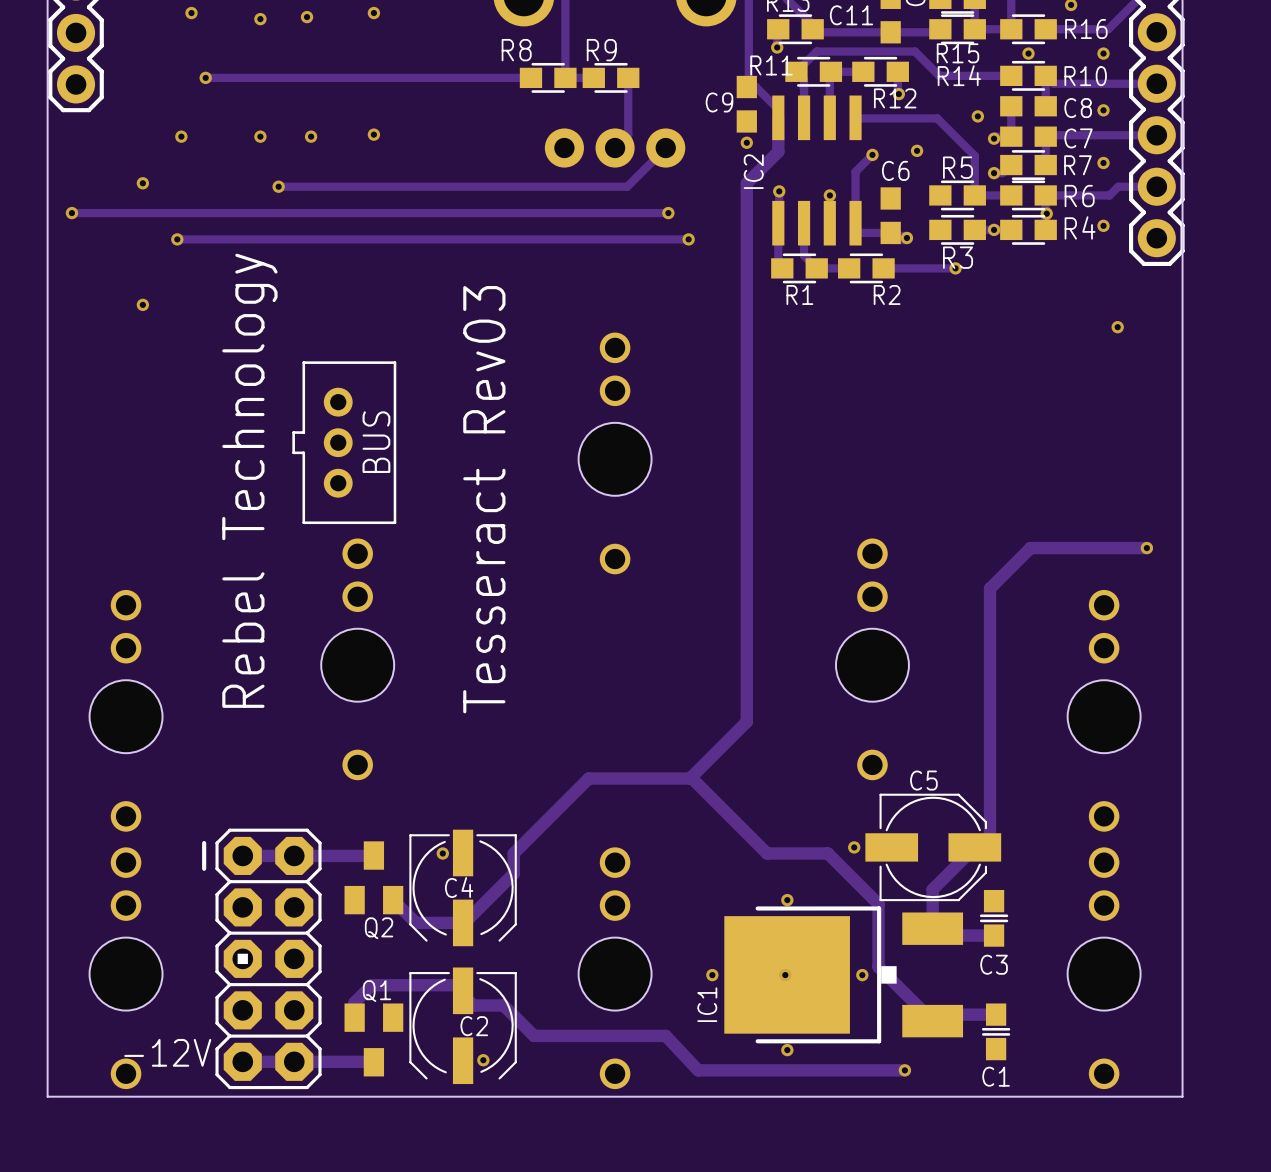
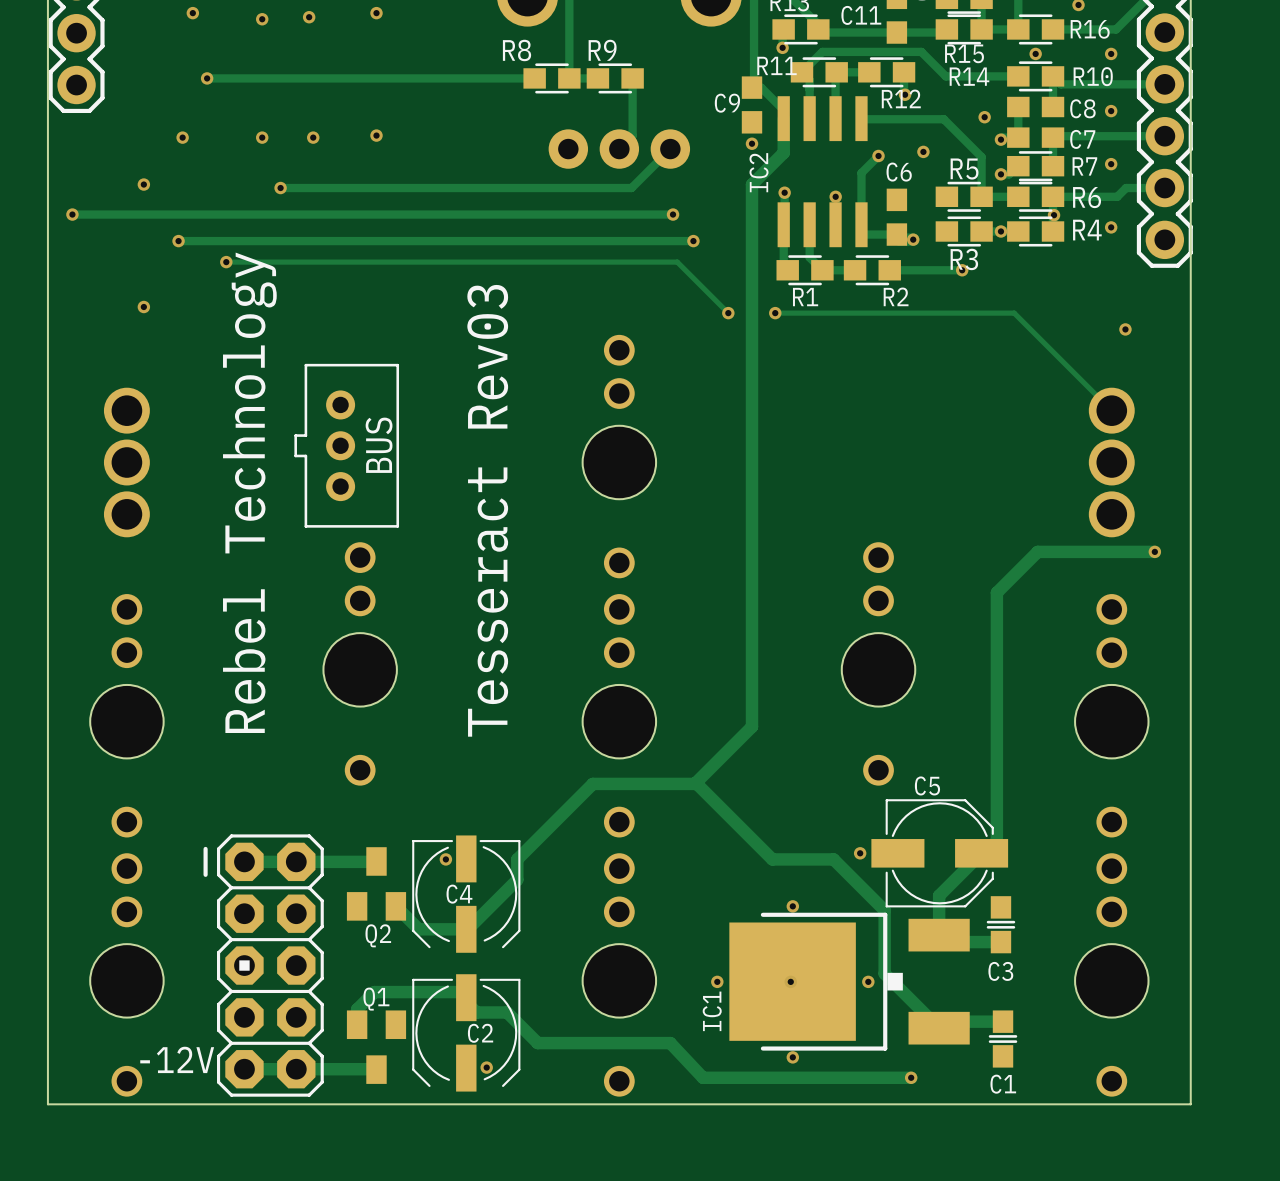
track: none -> (226, 262) (677, 262) (728, 313)
via: none -> (226, 262)
via: none -> (728, 313)
track: none -> (775, 313) (1014, 313) (1111, 410)
via: none -> (775, 313)
part: none -> (126, 462)
part: none -> (1111, 462)
part: none -> (619, 715)

